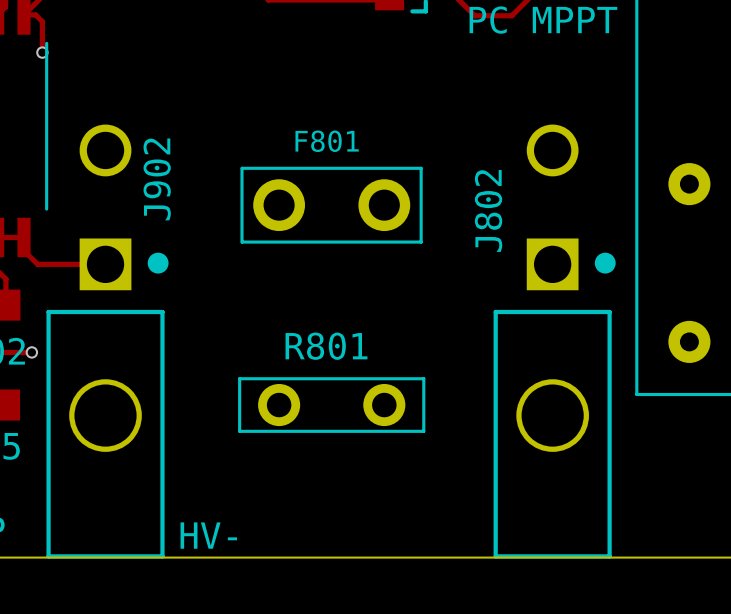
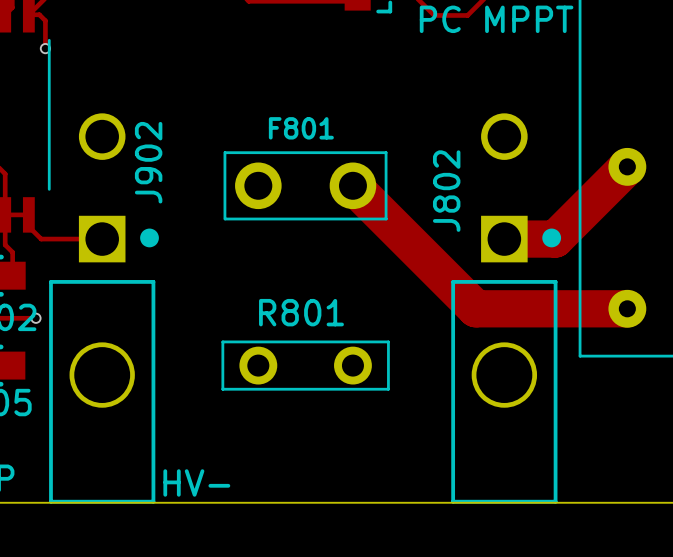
track: none -> (627, 166) (555, 239) (504, 239)
track: none -> (352, 185) (475, 308) (627, 308)

